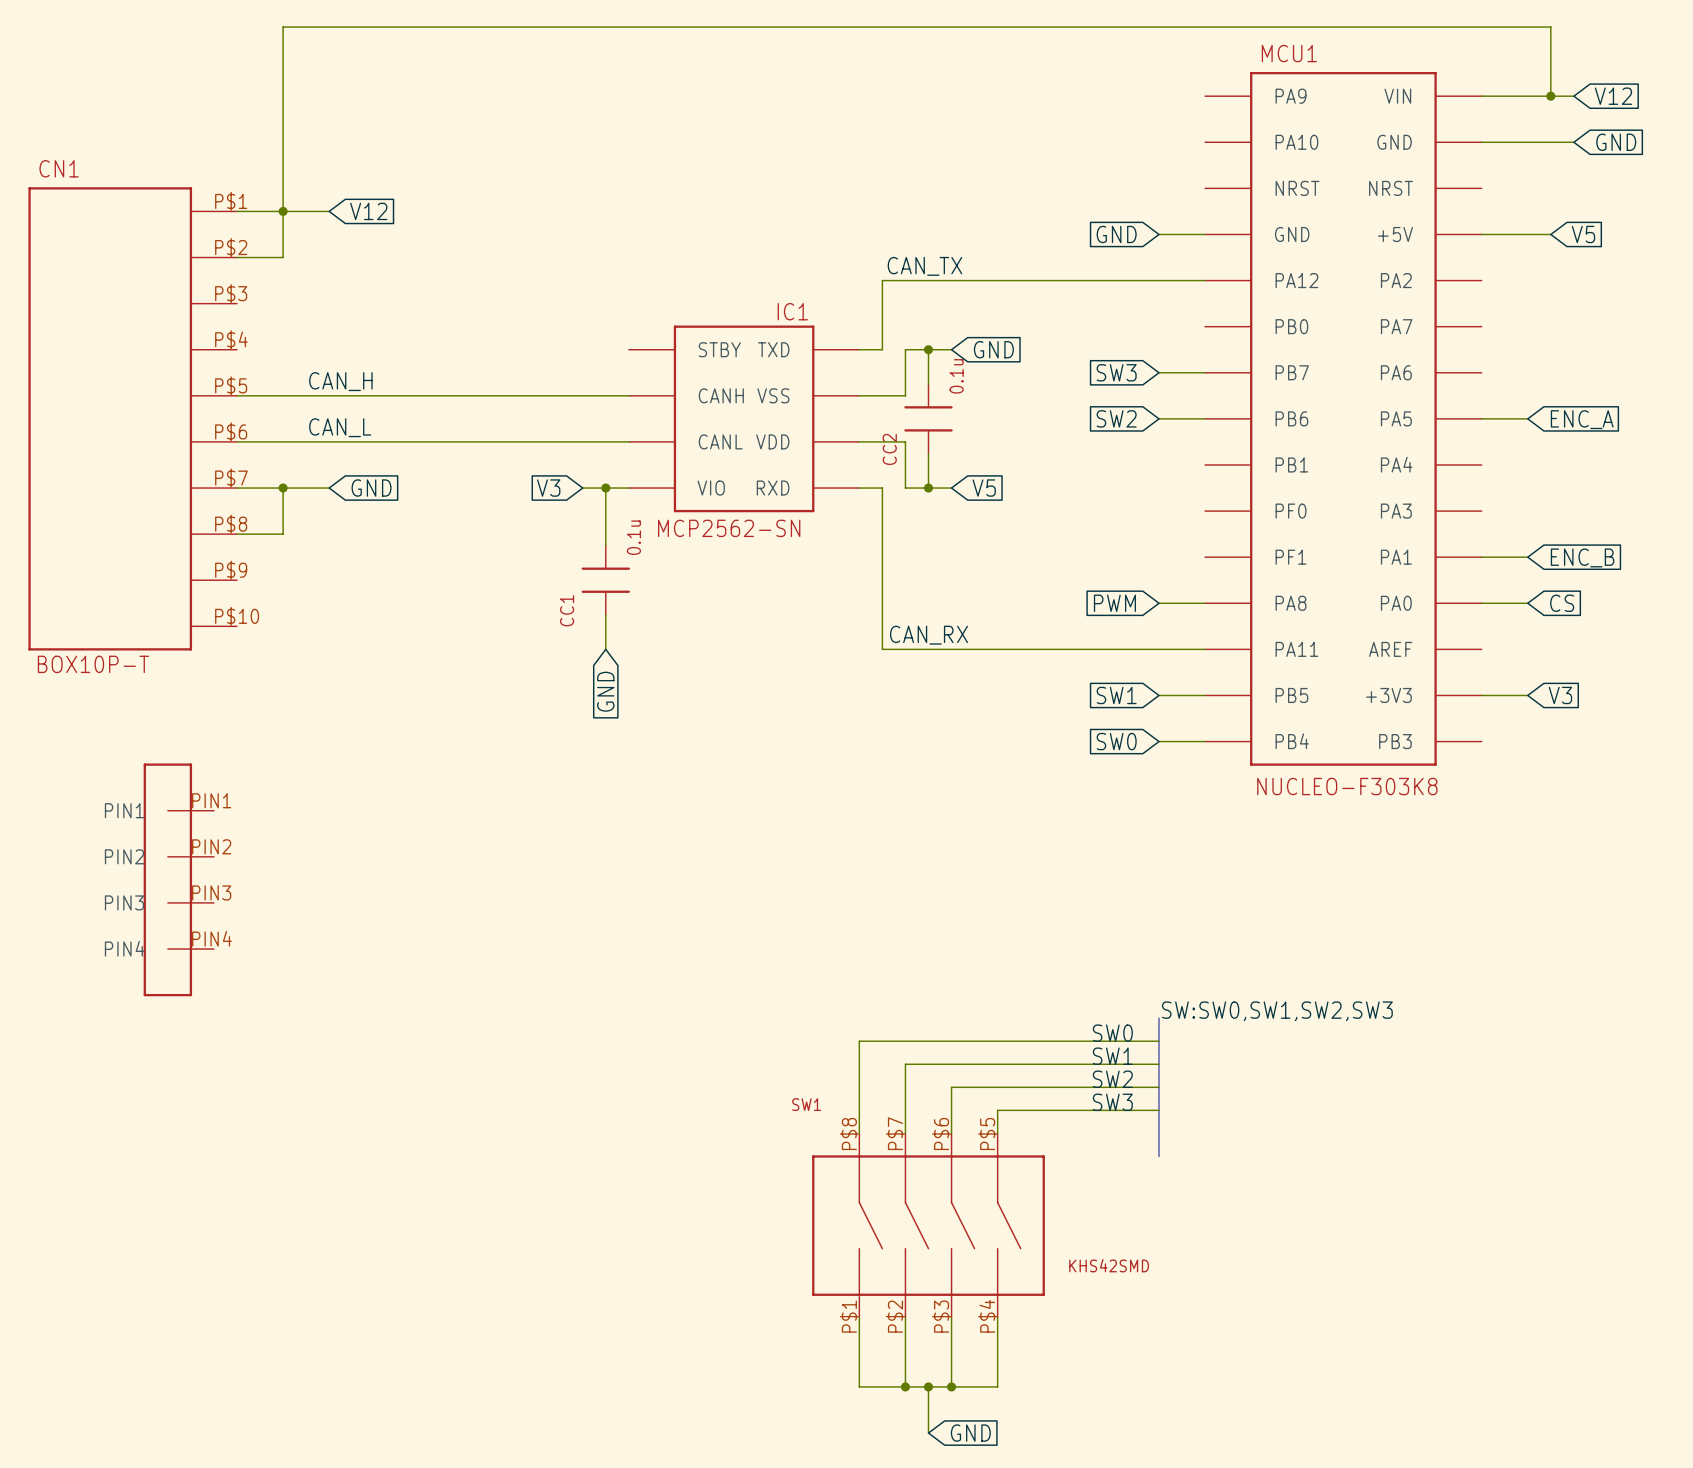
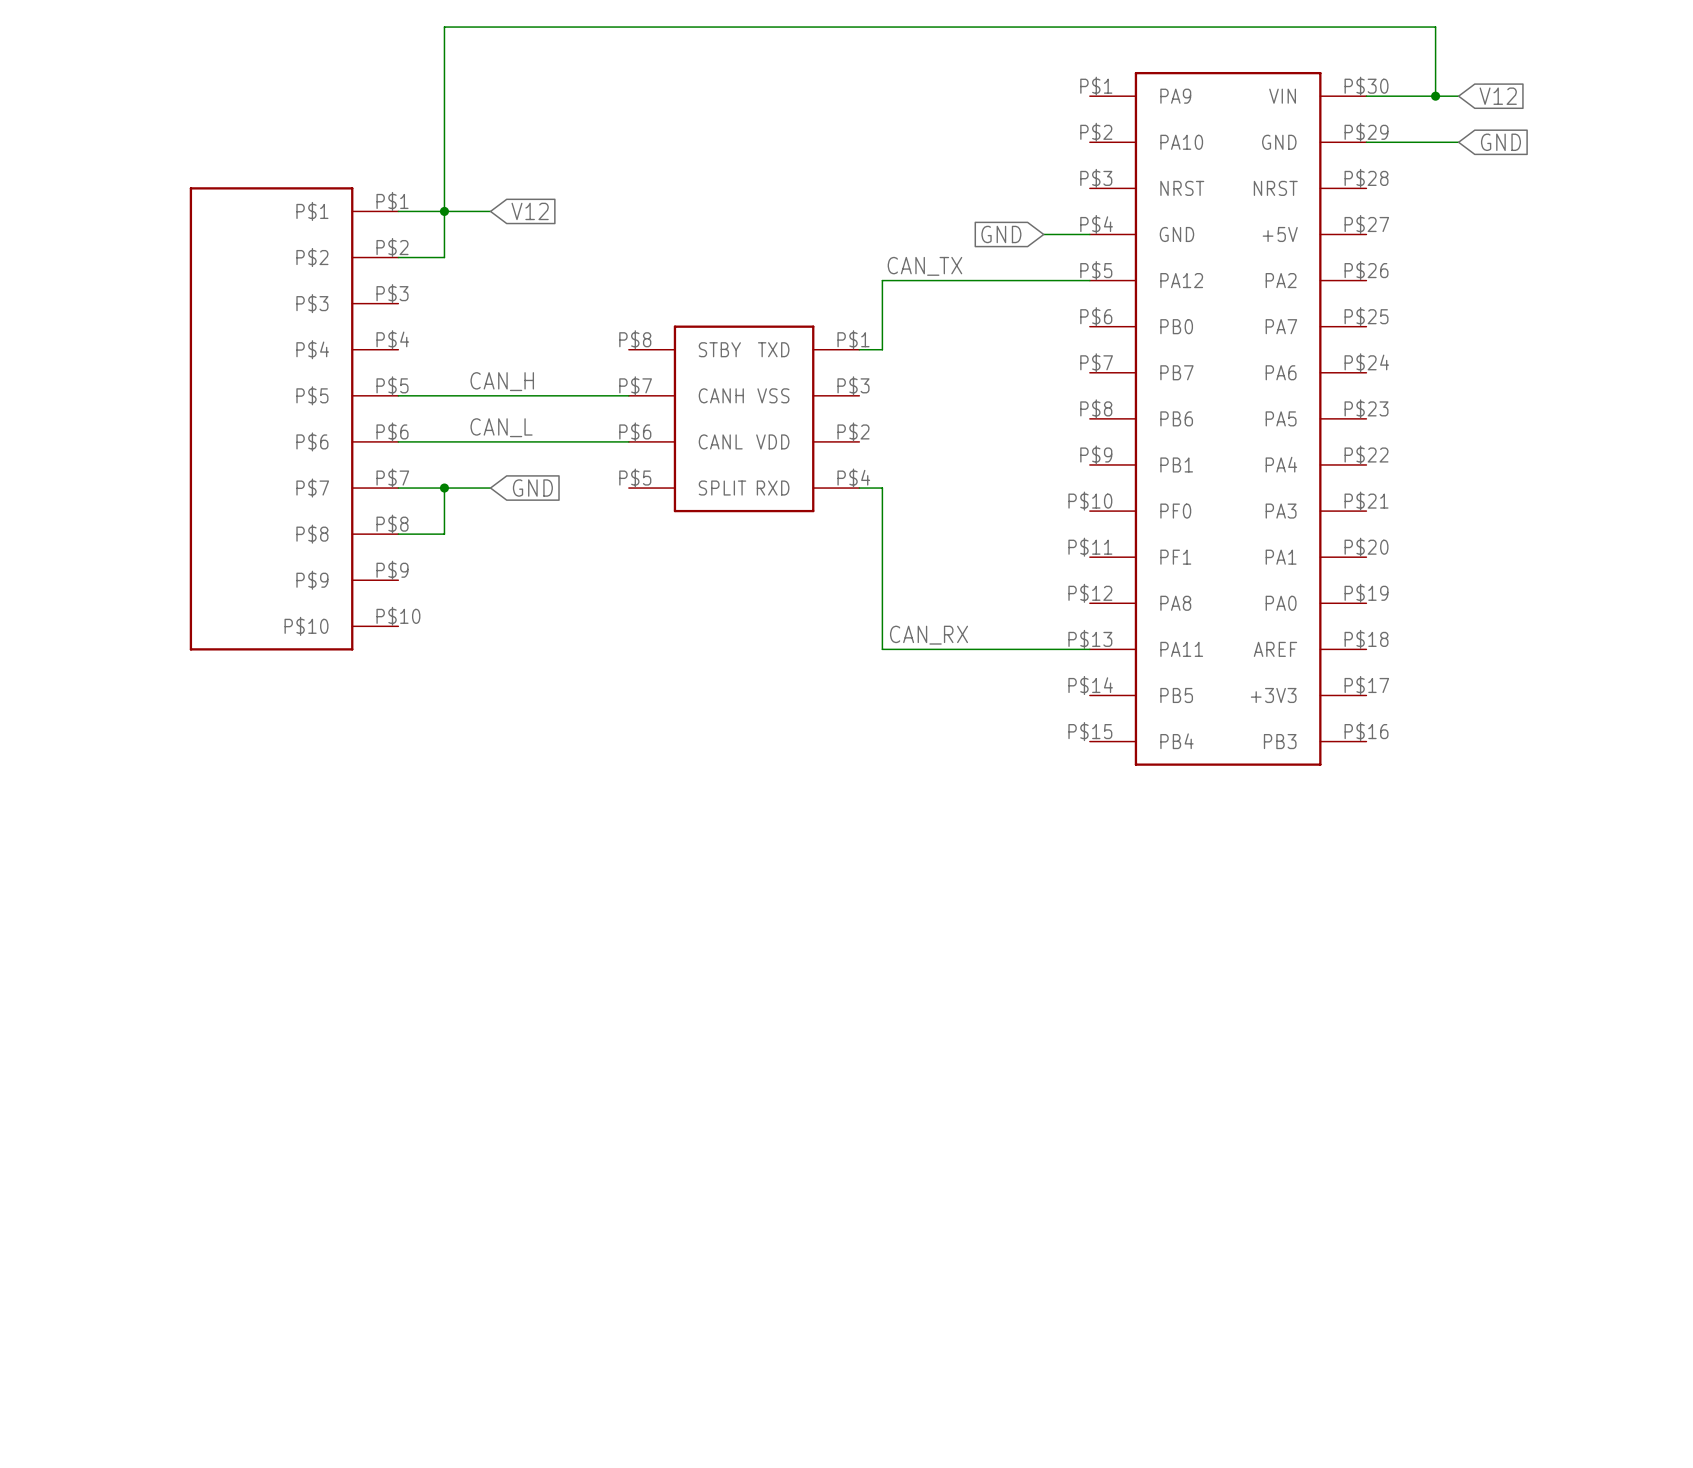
wire: (444, 27) (283, 27) (283, 257) (237, 257) -> (444, 27) (444, 257) (398, 257)
wire: (1435, 27) (1550, 27) (1550, 96) -> (1435, 27) (1435, 96)
junction: none -> (1435, 96)
wire: (1481, 96) (1573, 96) -> (1366, 96) (1458, 96)
junction: (1550, 96) -> none
global label position: V12 (1613, 96) -> V12 (1498, 96)
wire: (1481, 142) (1573, 142) -> (1366, 142) (1458, 142)
global label position: GND (1616, 142) -> GND (1500, 142)
wire: (237, 211) (329, 211) -> (398, 211) (490, 211)
junction: (283, 211) -> none
global label position: V12 (368, 211) -> V12 (530, 211)
junction: none -> (444, 211)
global label: none -> GND (1001, 234)
global label: GND (1116, 234) -> none
wire: (1158, 234) (1205, 234) -> (1043, 234) (1089, 234)
wire: (1481, 234) (1550, 234) -> none
global label: V5 (1583, 234) -> none
wire: (1089, 280) (1205, 280) -> none
IC1 name: IC1 (792, 311) -> none
IC1 symbol: [628, 325, 860, 513] -> [628, 325, 860, 513]
wire: (928, 349) (928, 384) -> none
junction: (928, 349) -> none
wire: (951, 349) (905, 349) (905, 395) (859, 395) -> none
global label: GND (993, 349) -> none
global label: SW3 (1116, 372) -> none
wire: (1158, 372) (1205, 372) -> none
label position: CAN_H (340, 381) -> CAN_H (502, 381)
wire: (237, 395) (398, 395) -> none
CN1: BOX10P-T (132, 418) -> none
part: none -> (294, 418)
CC2: 0.1u (928, 418) -> none
global label: SW2 (1116, 418) -> none
wire: (1158, 418) (1205, 418) -> none
part: none -> (1228, 418)
MCU1: NUCLEO-F303K8 (1343, 418) -> none
wire: (1481, 418) (1527, 418) -> none
global label: ENC_A (1582, 419) -> none
label position: CAN_L (340, 427) -> CAN_L (501, 427)
wire: (237, 441) (398, 441) -> none
wire: (859, 441) (905, 441) (905, 488) (951, 488) -> none
wire: (928, 453) (928, 488) -> none
wire: (237, 488) (329, 488) -> (398, 488) (490, 488)
wire: (283, 488) (283, 534) (237, 534) -> (444, 488) (444, 534) (398, 534)
junction: (283, 488) -> none
global label: GND (371, 488) -> none
junction: none -> (444, 488)
global label: none -> GND (532, 488)
global label: V3 (548, 488) -> none
wire: (582, 488) (628, 488) -> none
wire: (605, 488) (605, 545) -> none
junction: (605, 488) -> none
junction: (928, 488) -> none
global label: V5 (984, 488) -> none
IC1 value: MCP2562-SN (729, 528) -> none
wire: (1481, 557) (1527, 557) -> none
global label: ENC_B (1582, 557) -> none
CC1: 0.1u (605, 580) -> none
global label: PWM (1114, 603) -> none
wire: (1158, 603) (1205, 603) -> none
wire: (1481, 603) (1527, 603) -> none
global label: CS (1562, 603) -> none
wire: (605, 614) (605, 649) -> none
wire: (1089, 649) (1205, 649) -> none
global label: GND (605, 691) -> none
global label: SW1 (1116, 695) -> none
wire: (1158, 695) (1205, 695) -> none
wire: (1481, 695) (1527, 695) -> none
global label: V3 (1560, 695) -> none
global label: SW0 (1116, 741) -> none
wire: (1158, 741) (1205, 741) -> none
part: (178, 879) -> none
label: SW:SW0,SW1,SW2,SW3 (1277, 1011) -> none
bus: (1158, 1018) (1158, 1156) -> none
label: SW0 (1112, 1033) -> none
wire: (1158, 1041) (859, 1041) (859, 1133) -> none
label: SW1 (1112, 1056) -> none
wire: (1158, 1064) (905, 1064) (905, 1133) -> none
label: SW2 (1112, 1079) -> none
wire: (1158, 1087) (951, 1087) (951, 1133) -> none
label: SW3 (1112, 1102) -> none
wire: (1158, 1110) (997, 1110) (997, 1133) -> none
SW1: KHS42SMD (928, 1225) -> none
wire: (859, 1317) (859, 1386) (997, 1386) (997, 1317) -> none
wire: (905, 1317) (905, 1386) -> none
wire: (951, 1317) (951, 1386) -> none
junction: (905, 1386) -> none
wire: (928, 1386) (928, 1433) -> none
junction: (928, 1386) -> none
junction: (951, 1386) -> none
global label: GND (970, 1433) -> none

